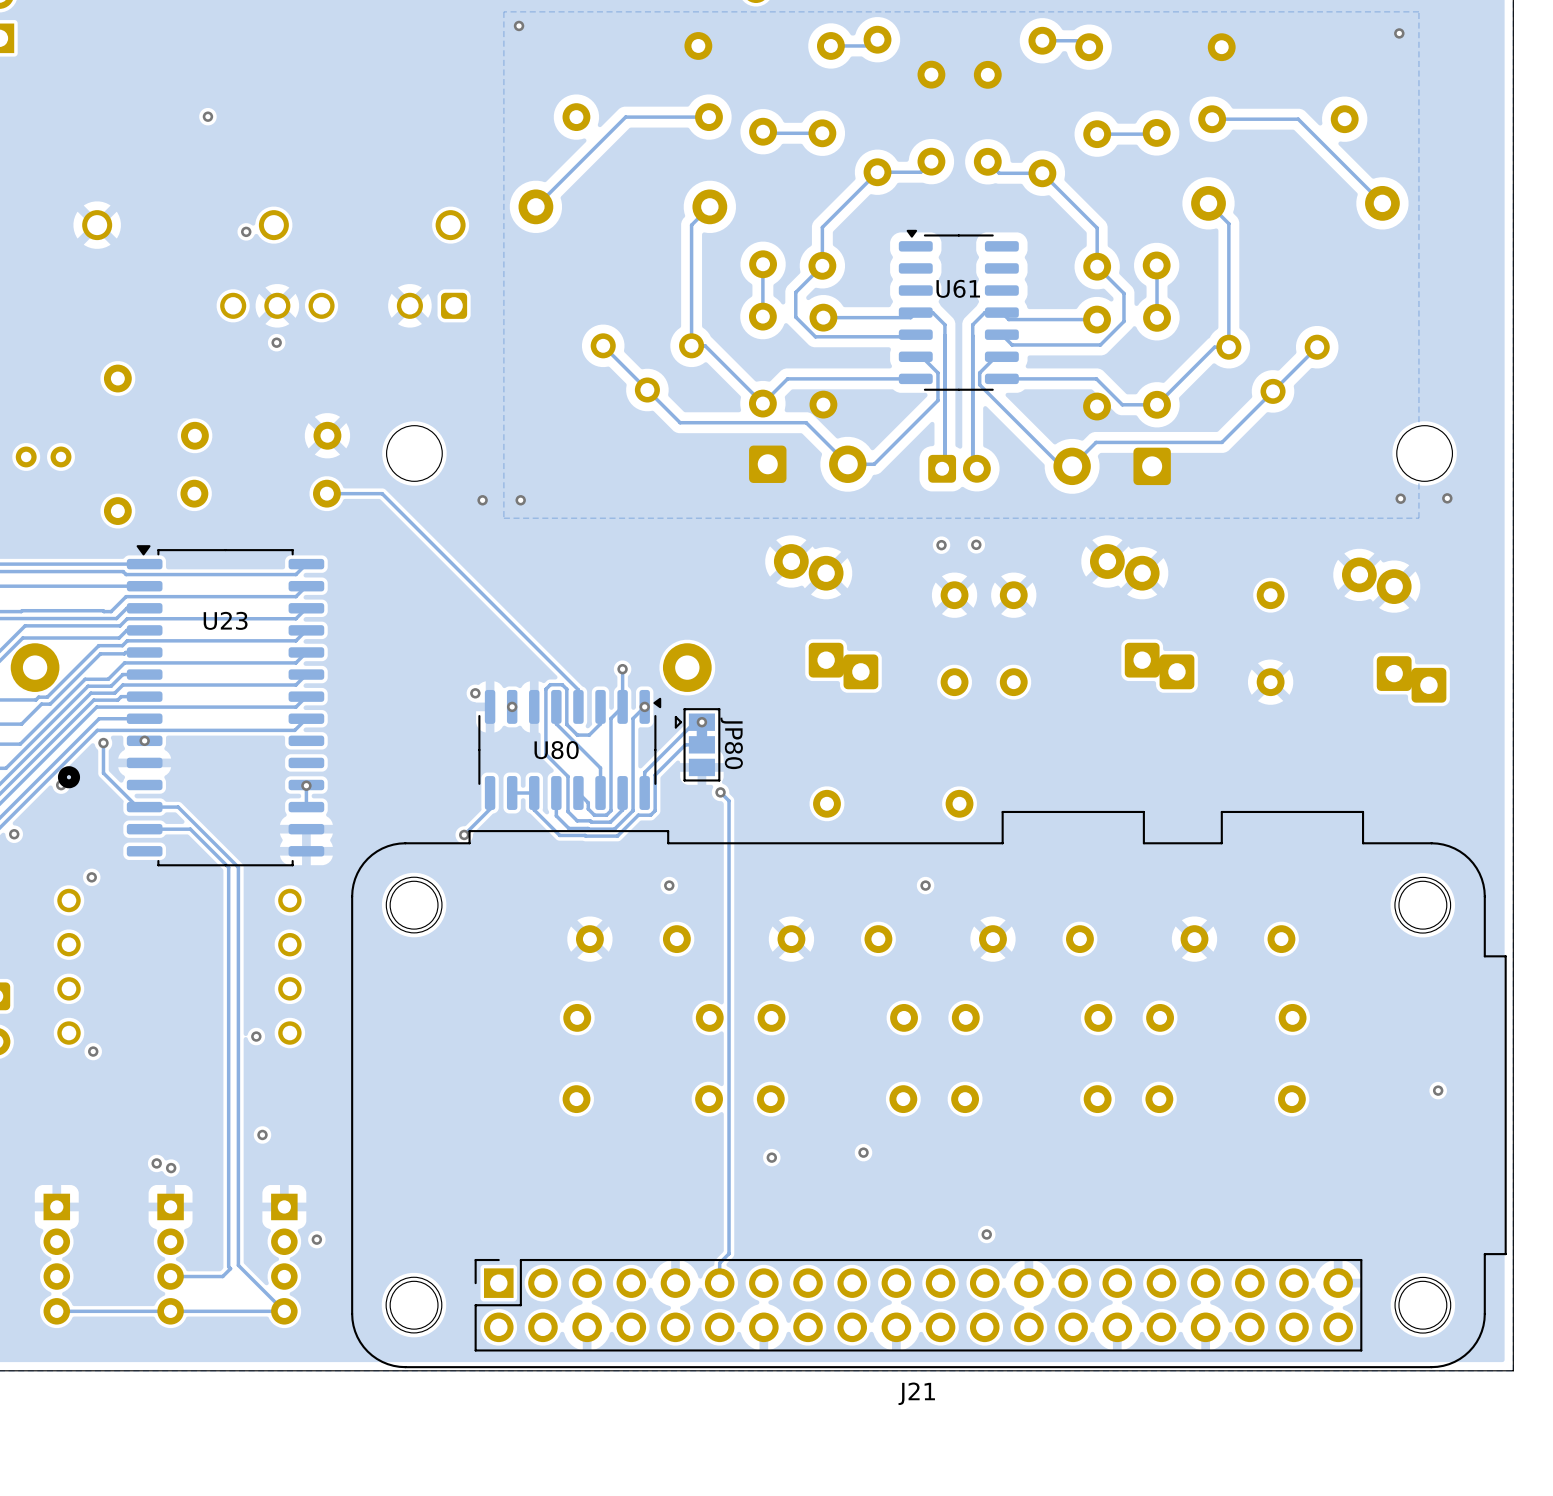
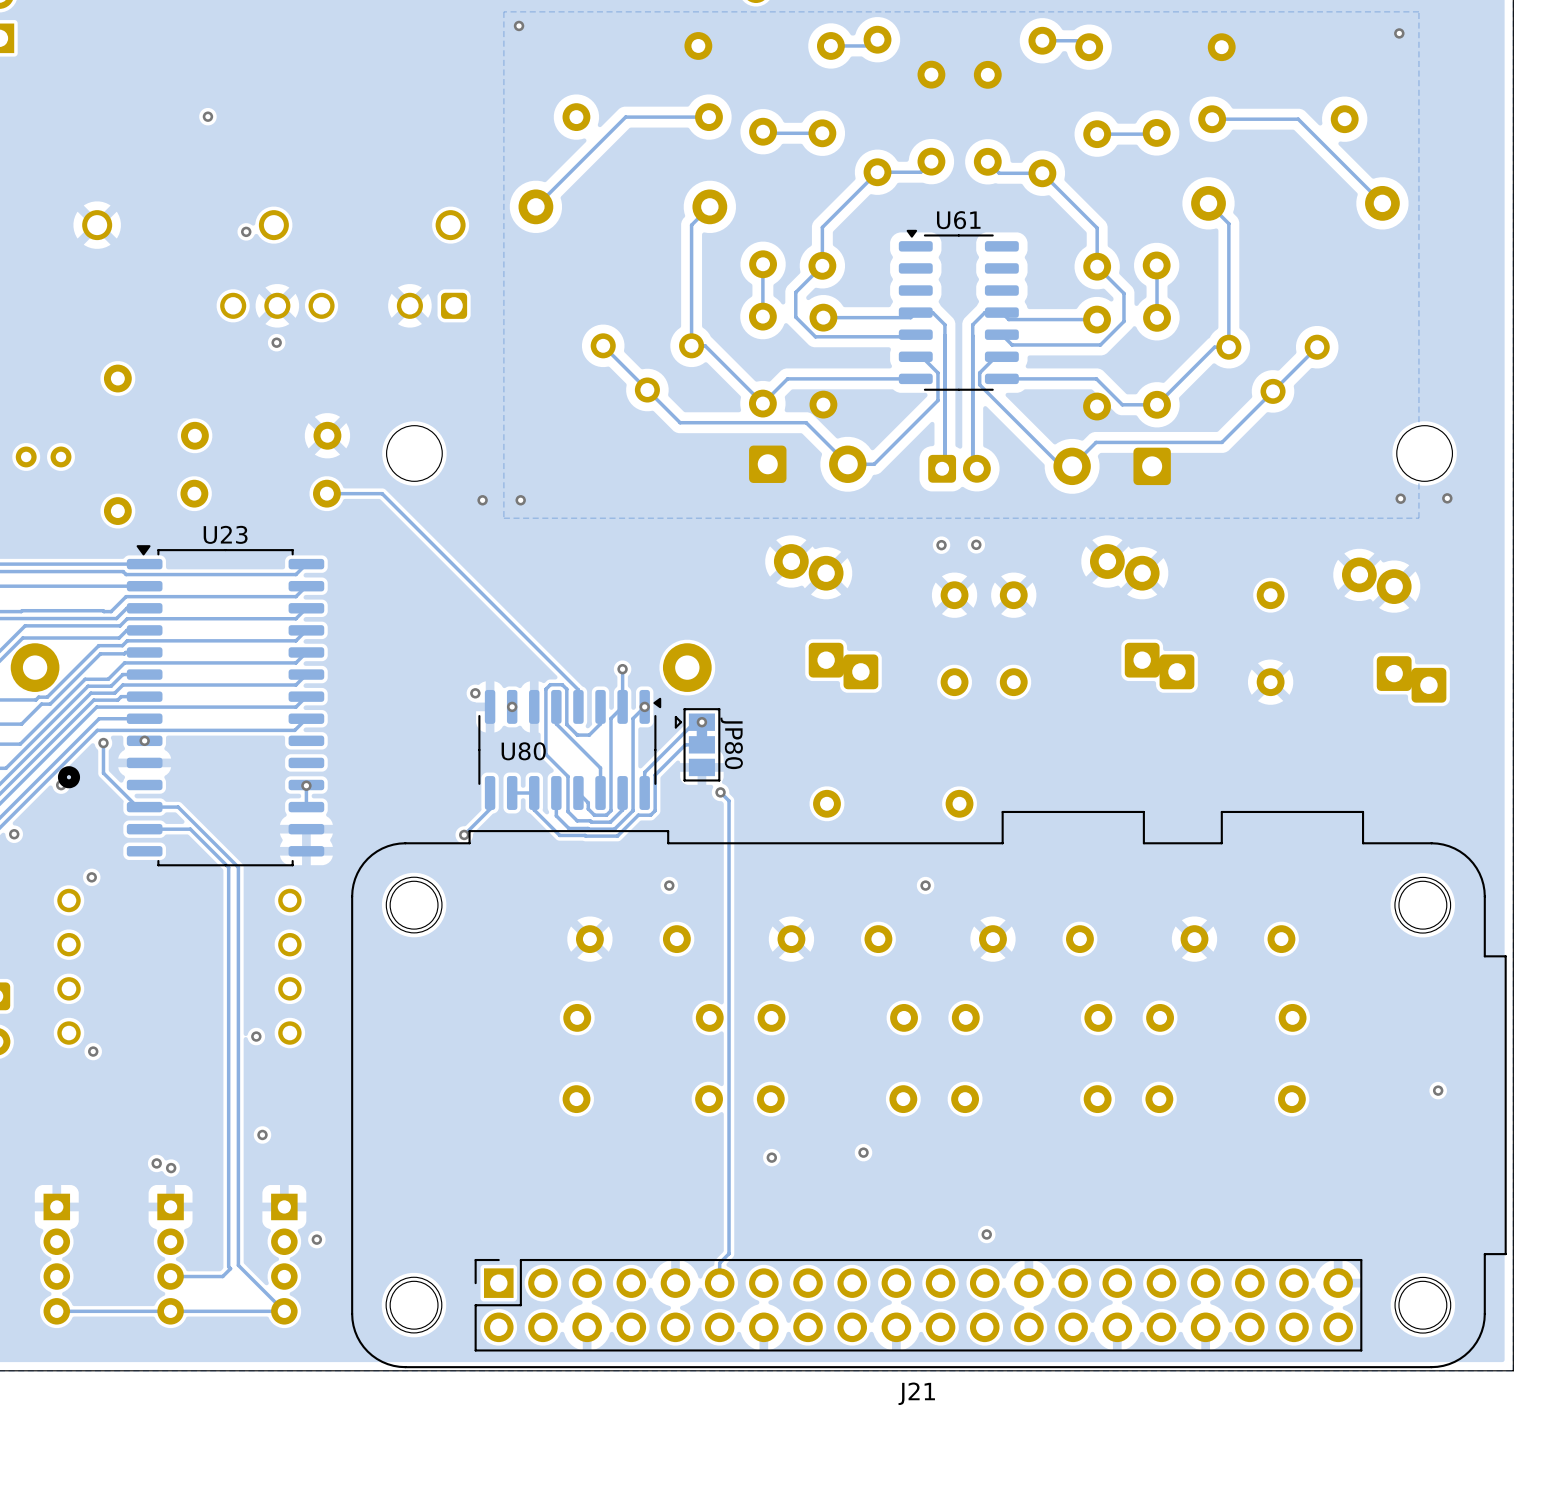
U61 name position: U61 (958, 288) -> U61 (958, 220)
U23 name position: U23 (225, 620) -> U23 (225, 534)
U80 name position: U80 (556, 750) -> U80 (523, 751)

